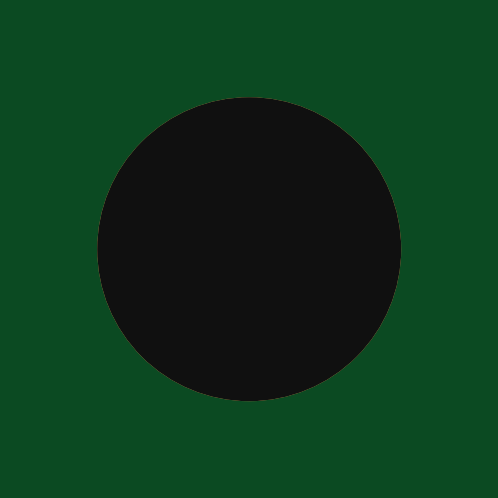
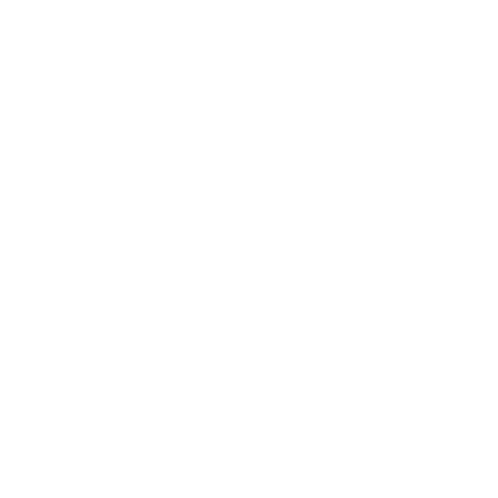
part: (249, 249) -> none

